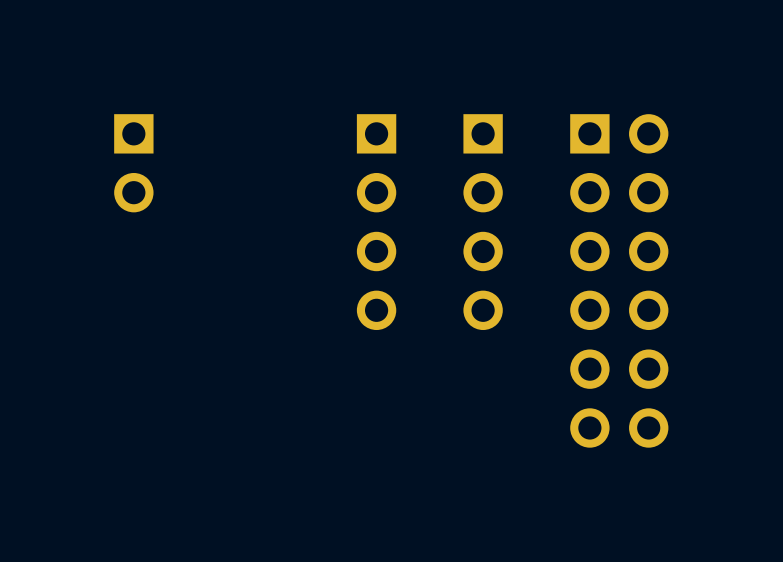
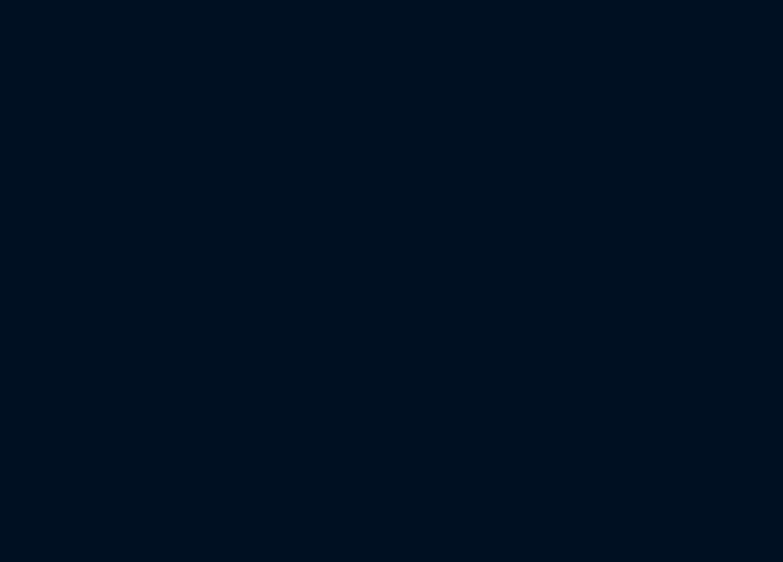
part: (133, 163) -> none
part: (376, 222) -> none
part: (483, 222) -> none
part: (619, 280) -> none

